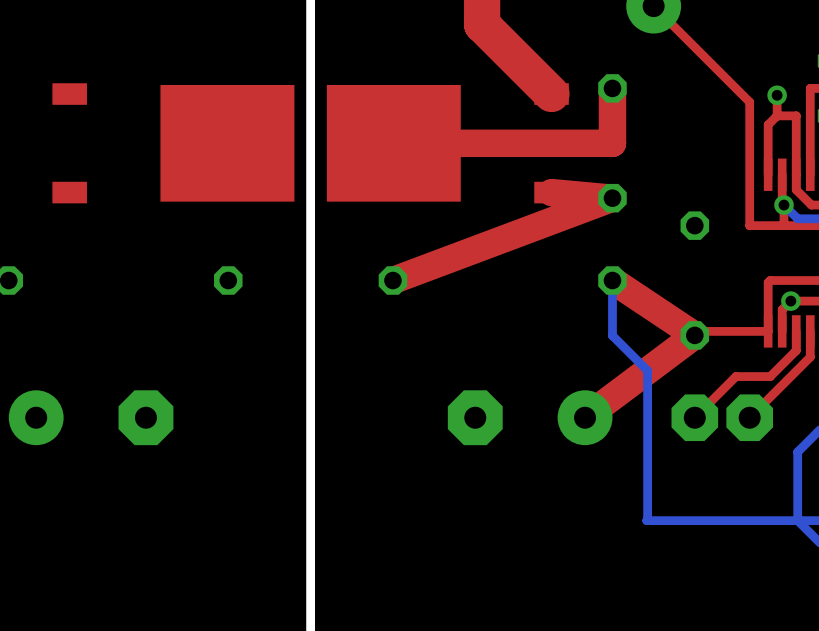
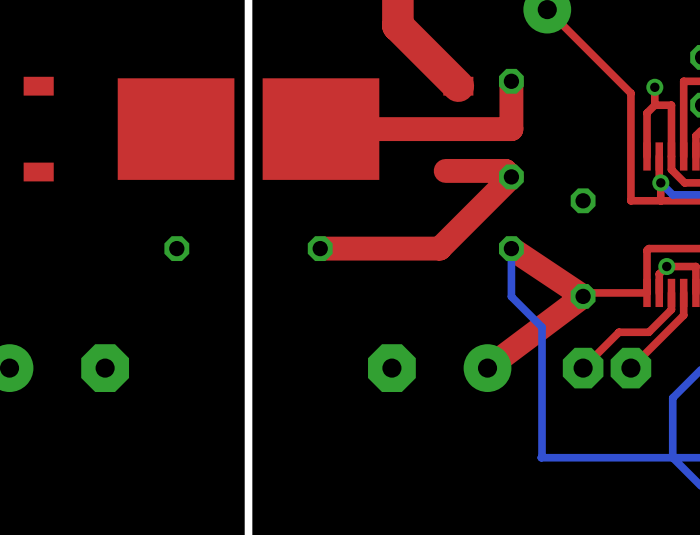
top track: (551, 192) (612, 198) (392, 280) -> (445, 170) (505, 170) (511, 176) (439, 248) (320, 248)

